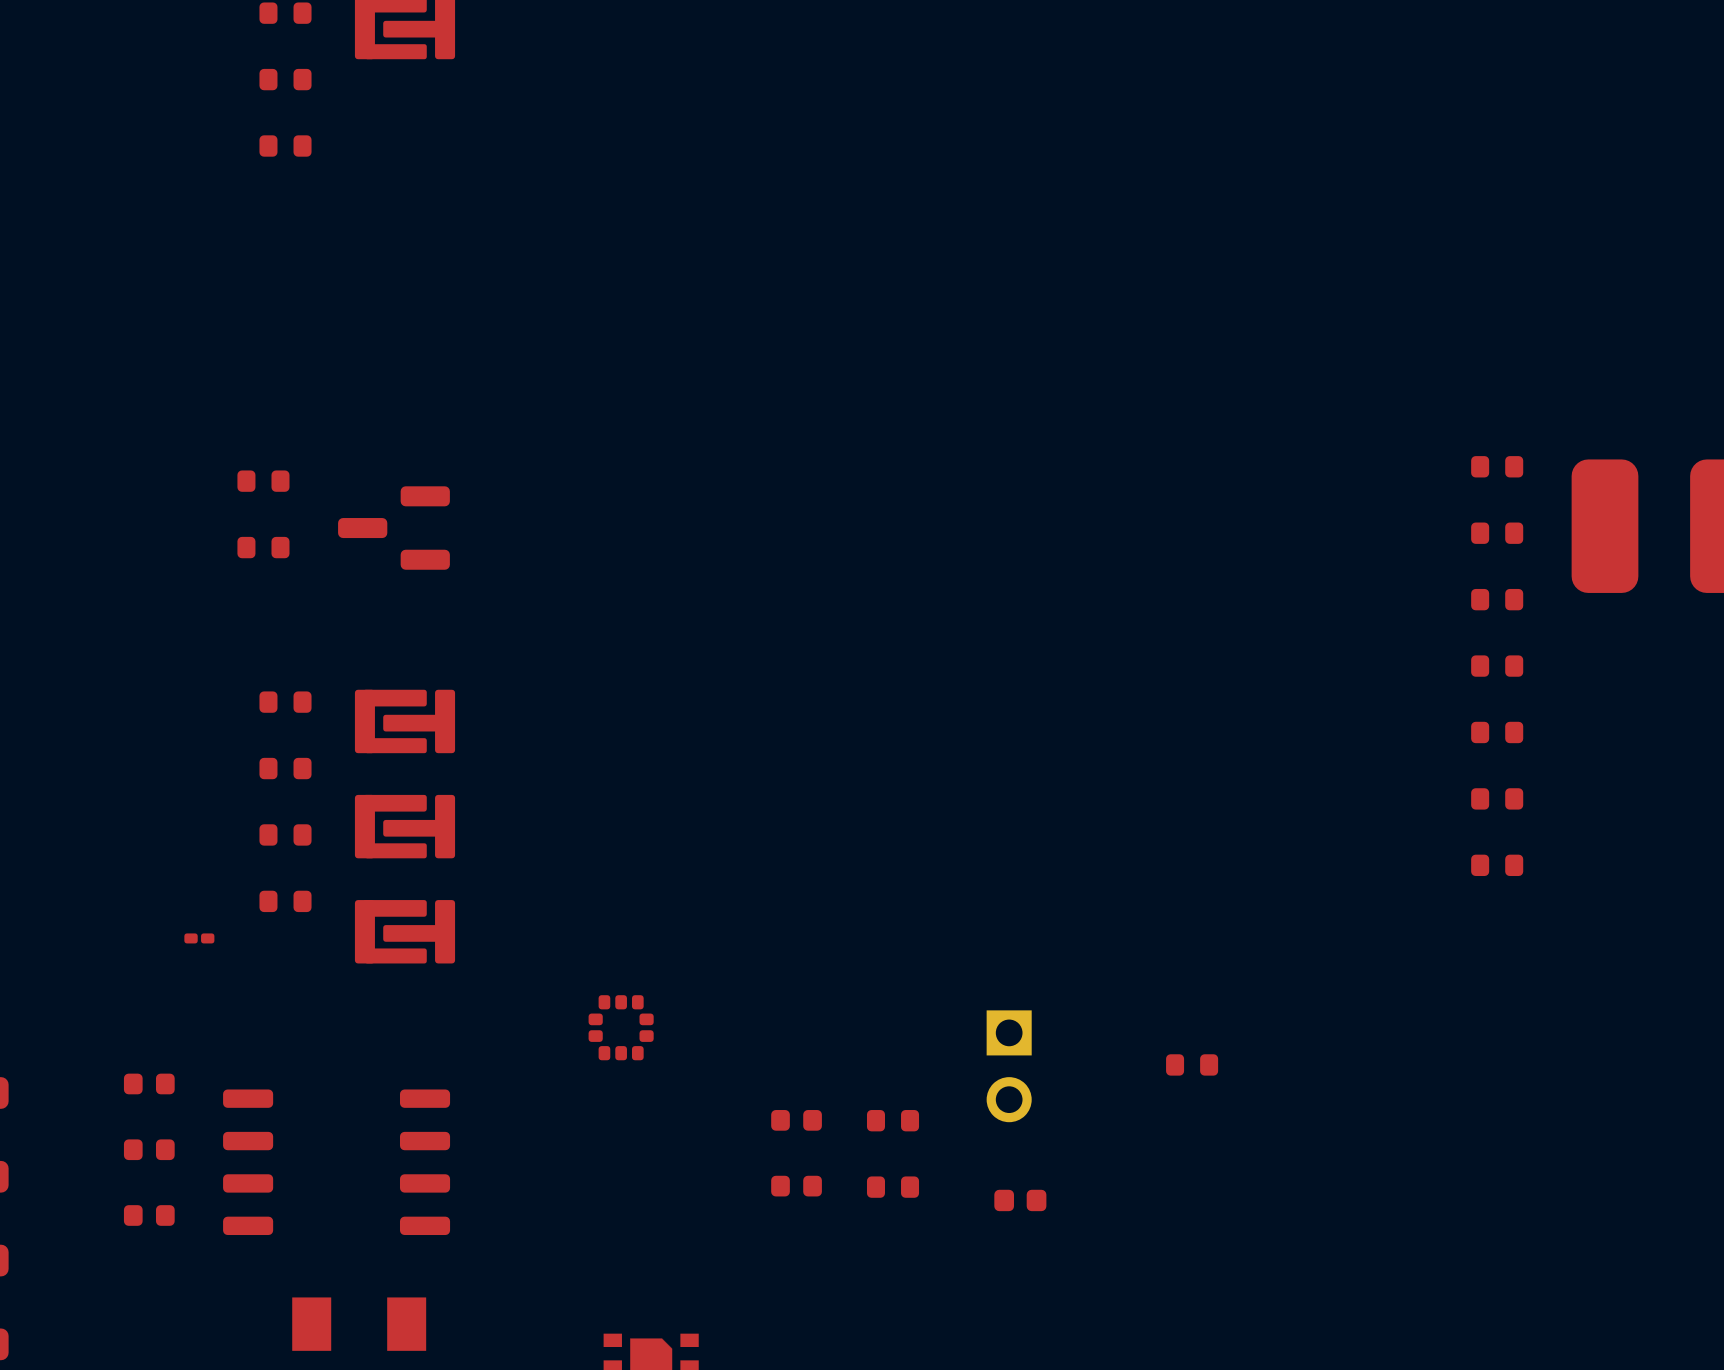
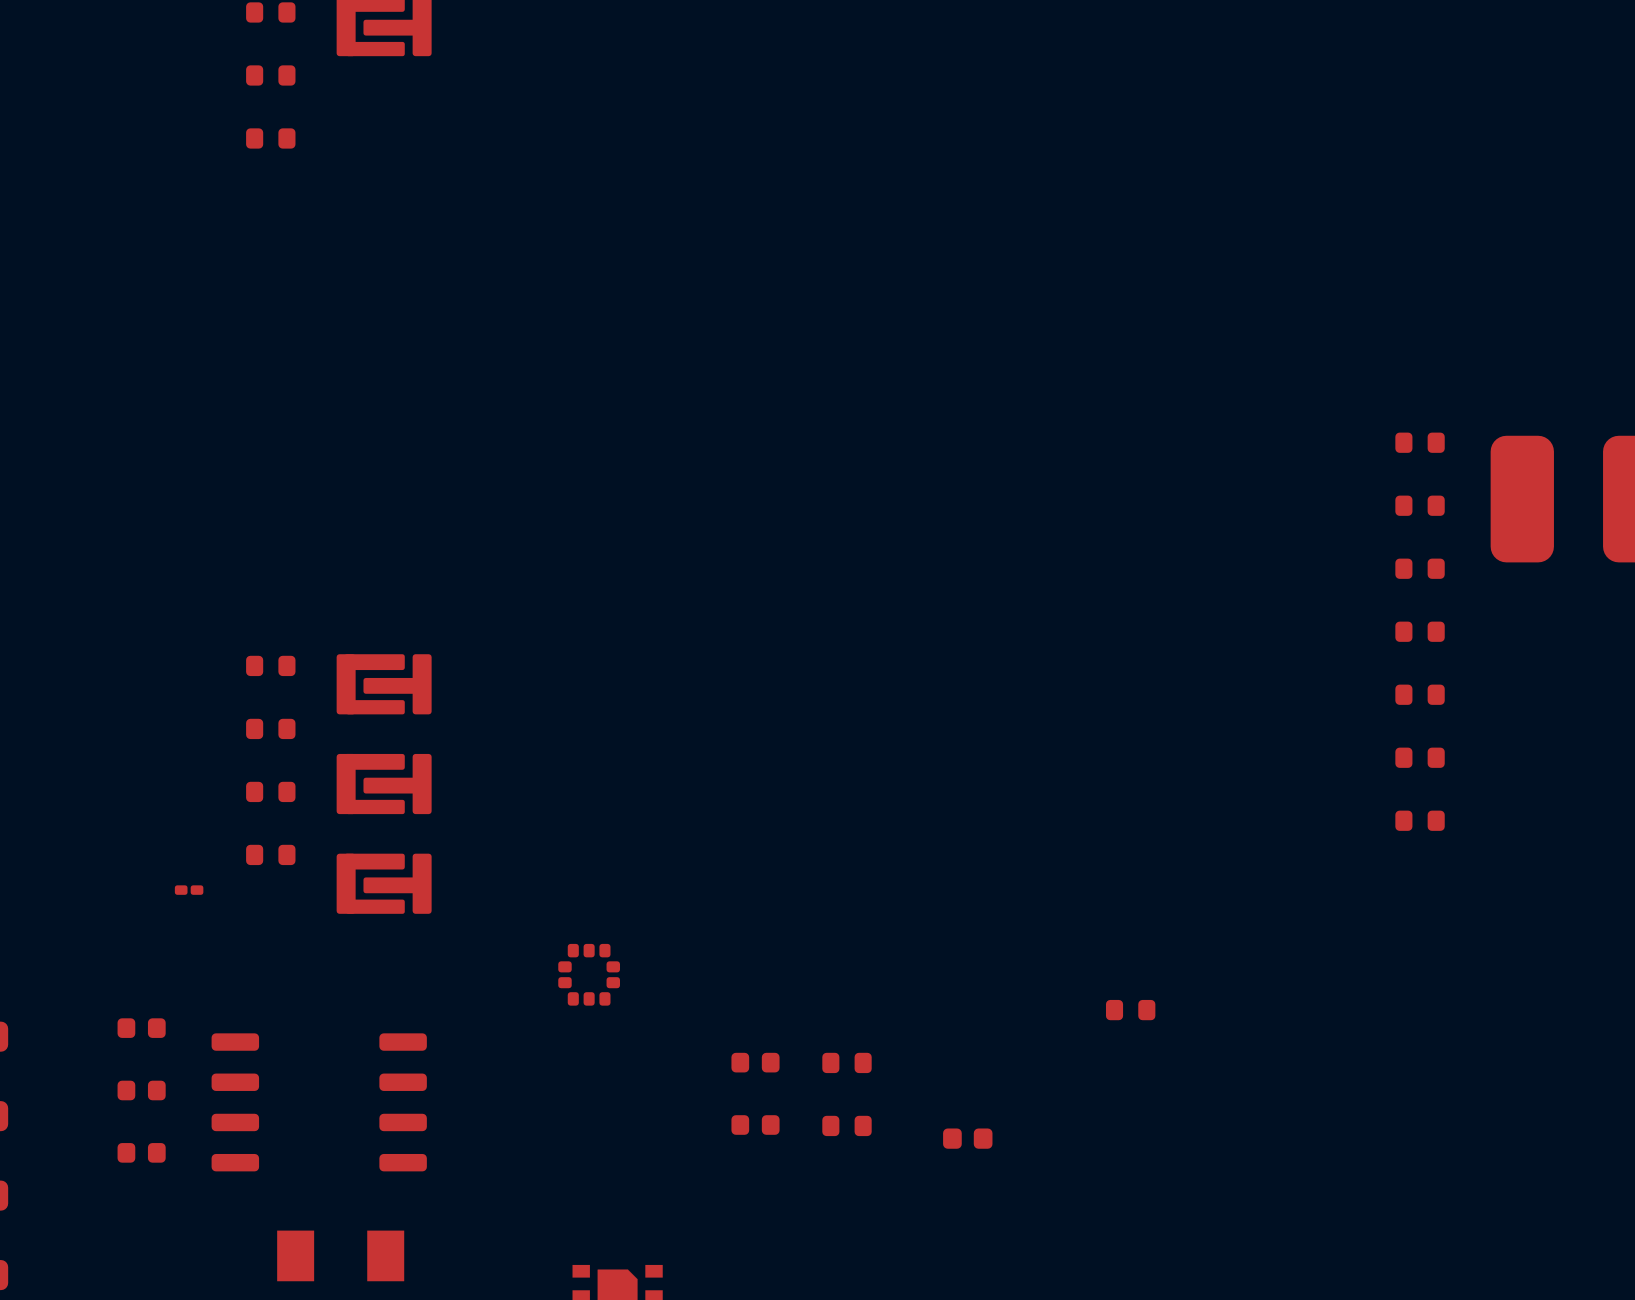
part: (263, 481) -> none
part: (393, 528) -> none
part: (263, 547) -> none
part: (1009, 1066) -> none

